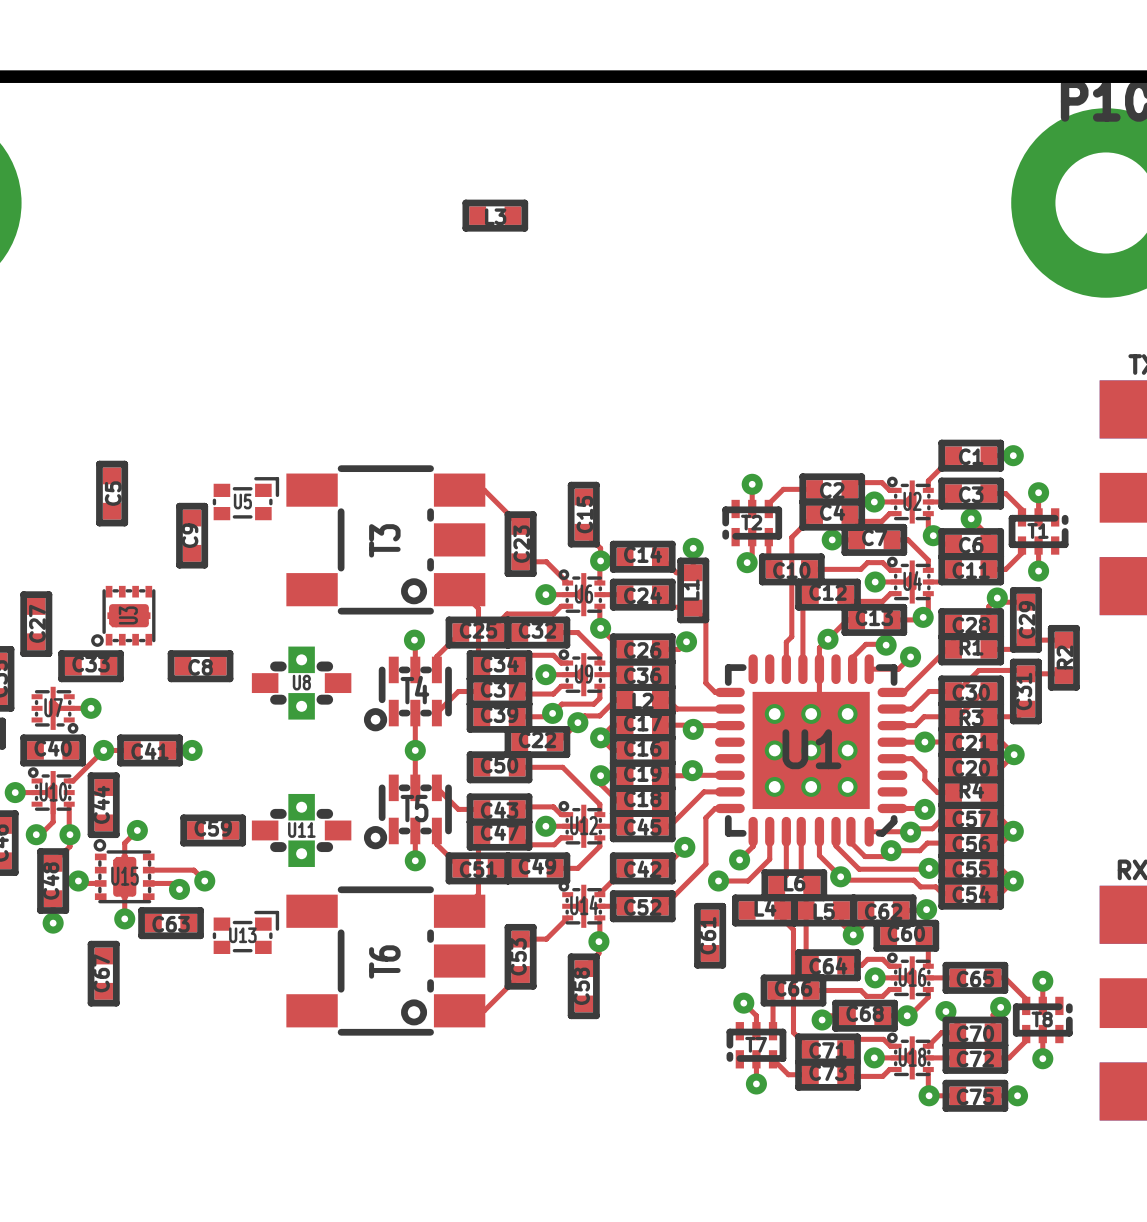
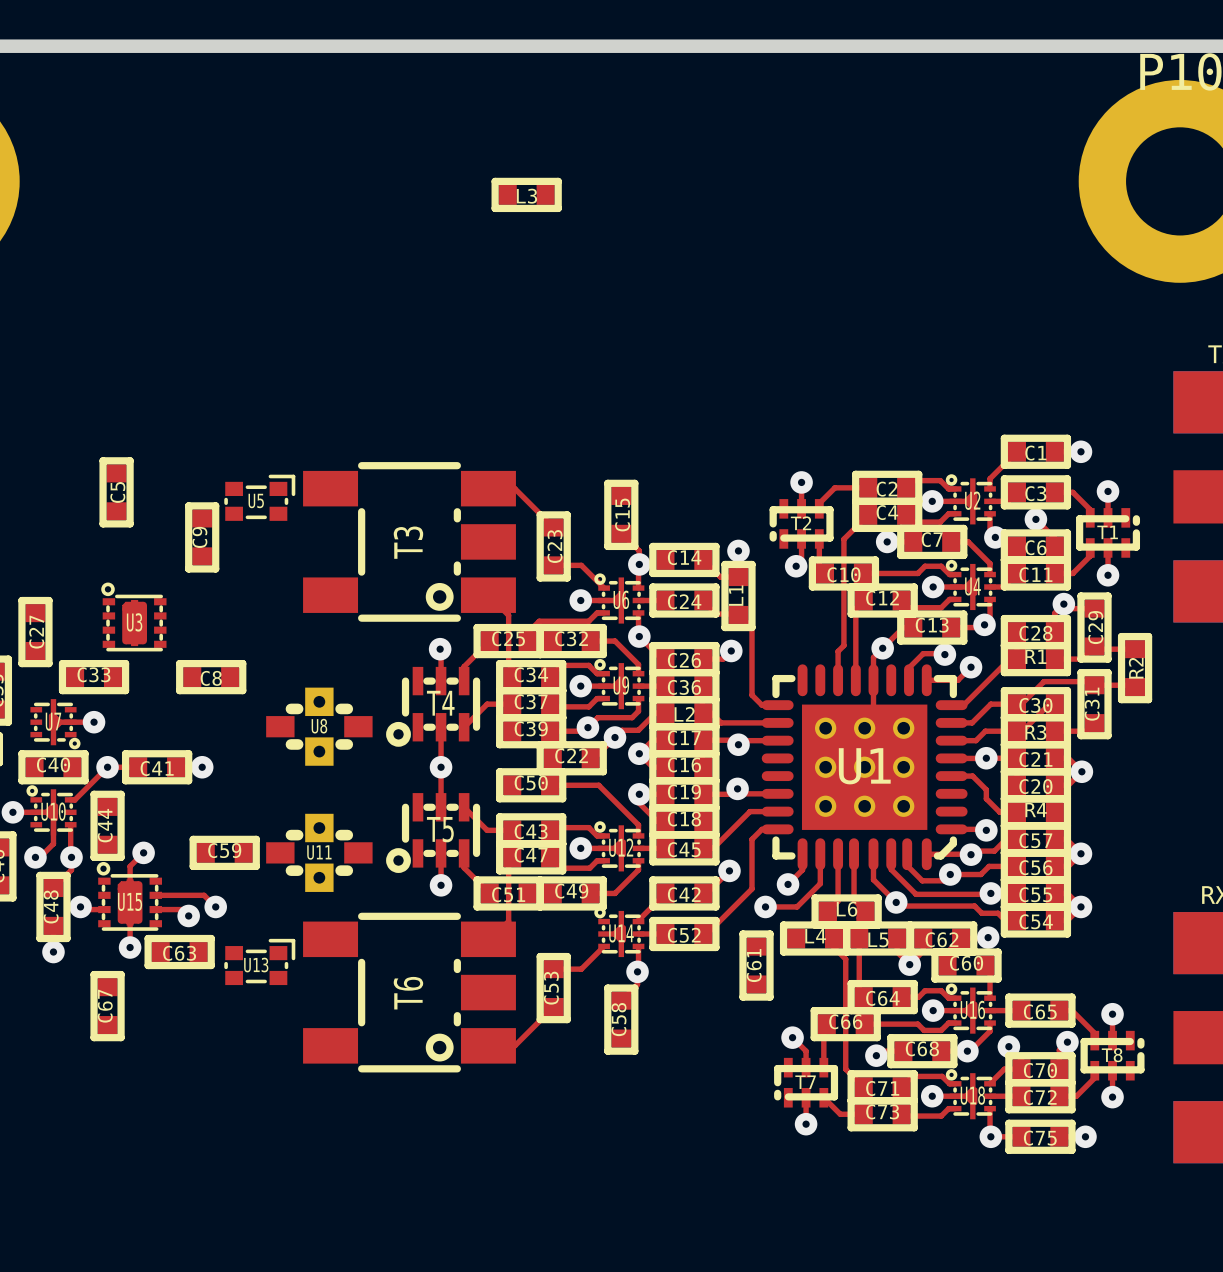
U3 rotation: 0° (123, 616) -> 90° clockwise (133, 617)
U8 position: (301, 683) -> (319, 726)

